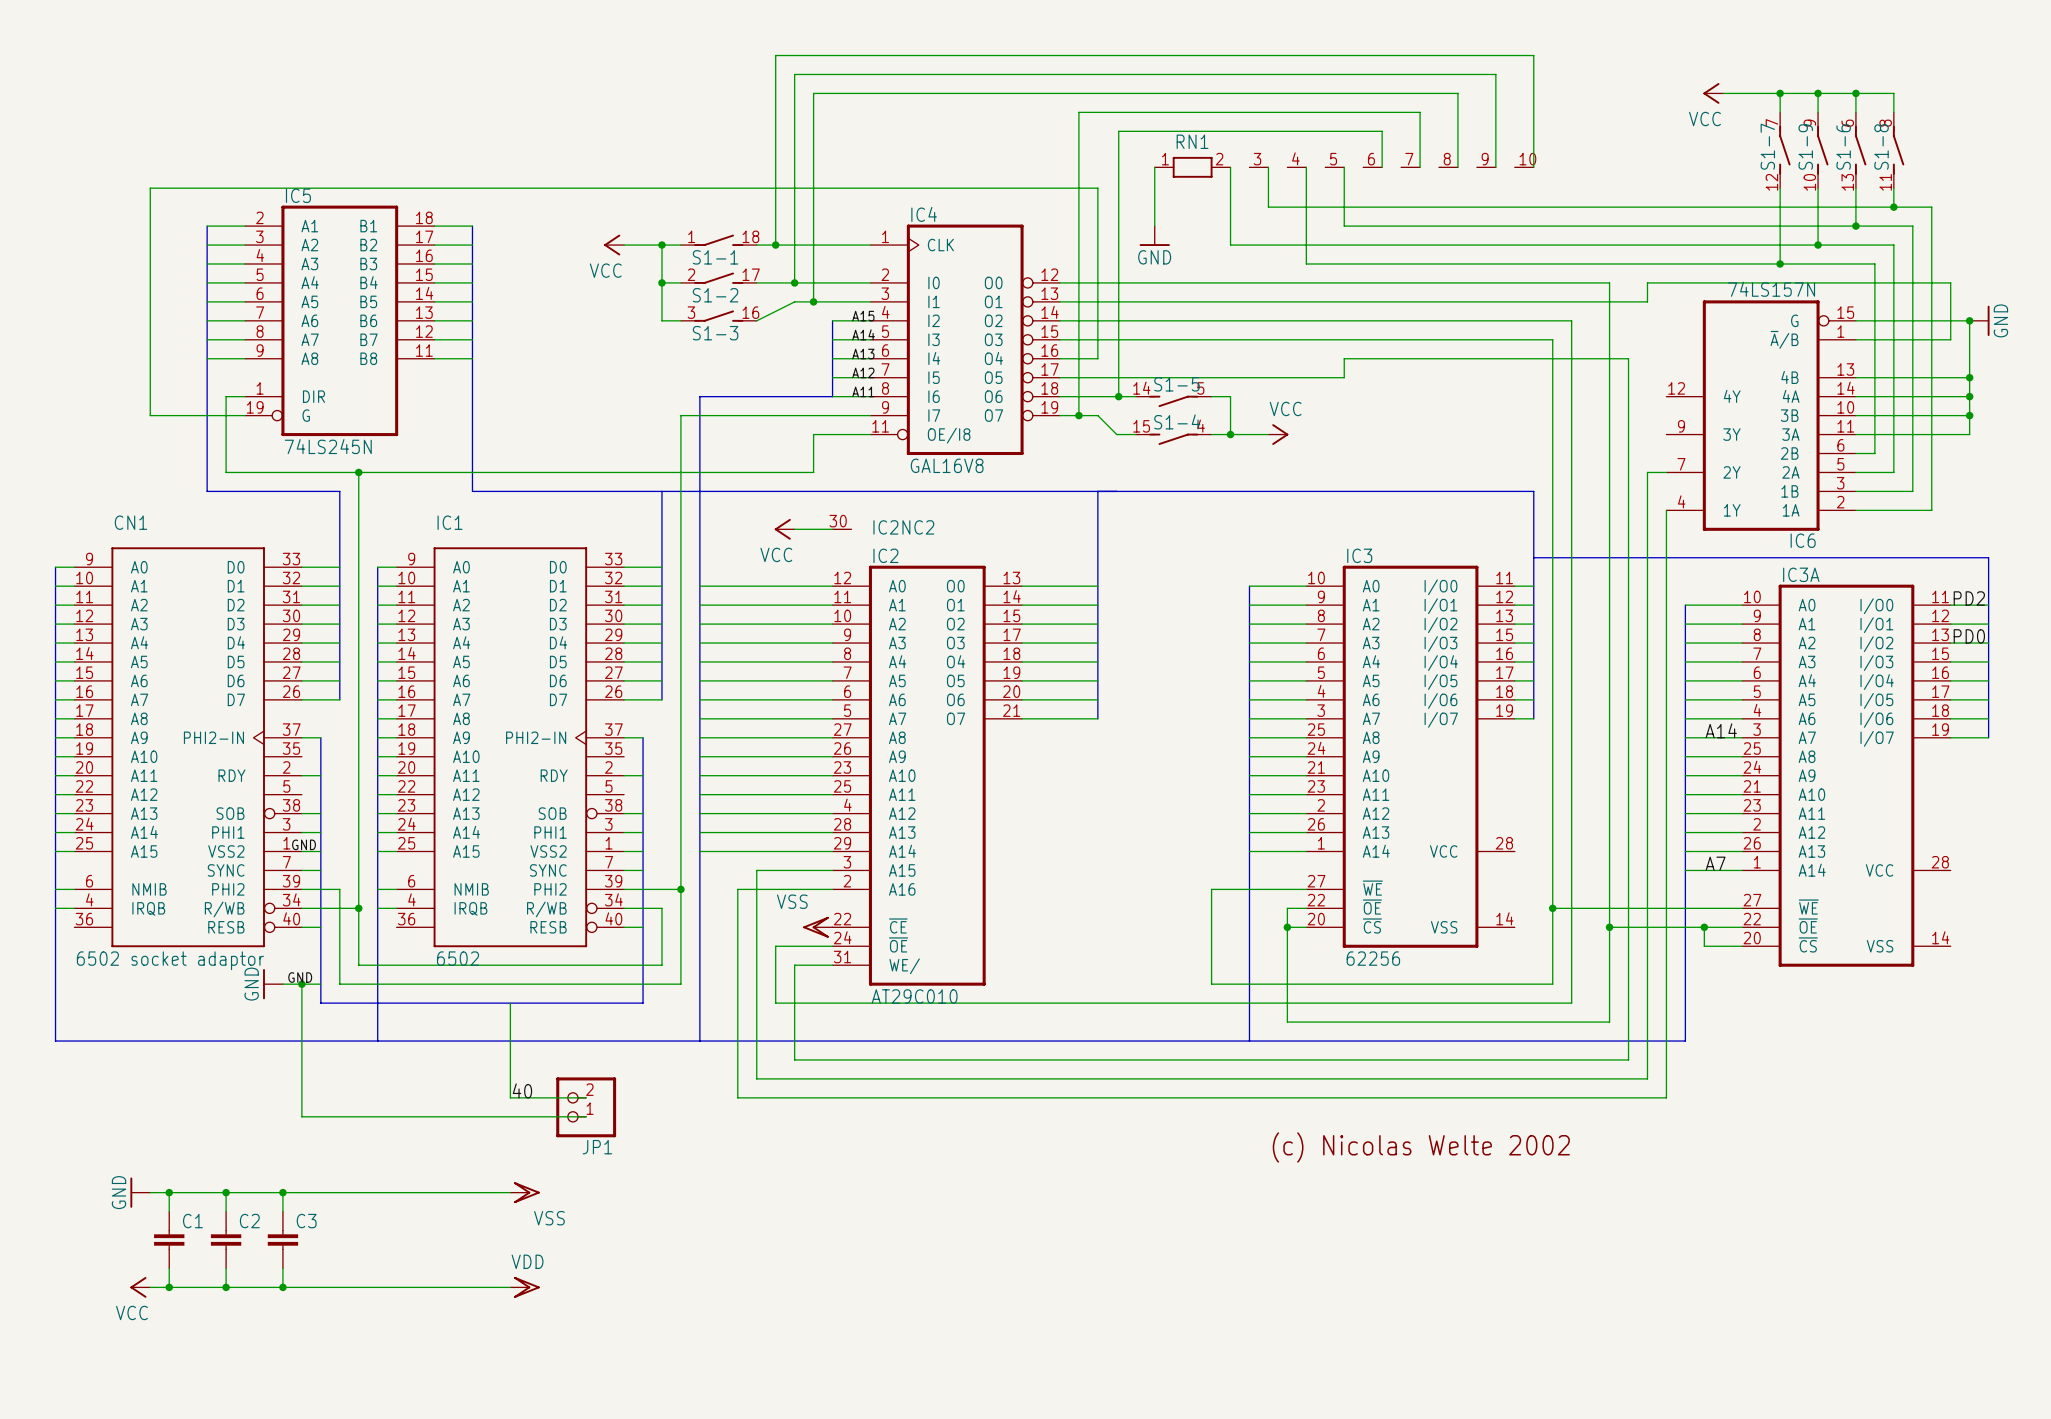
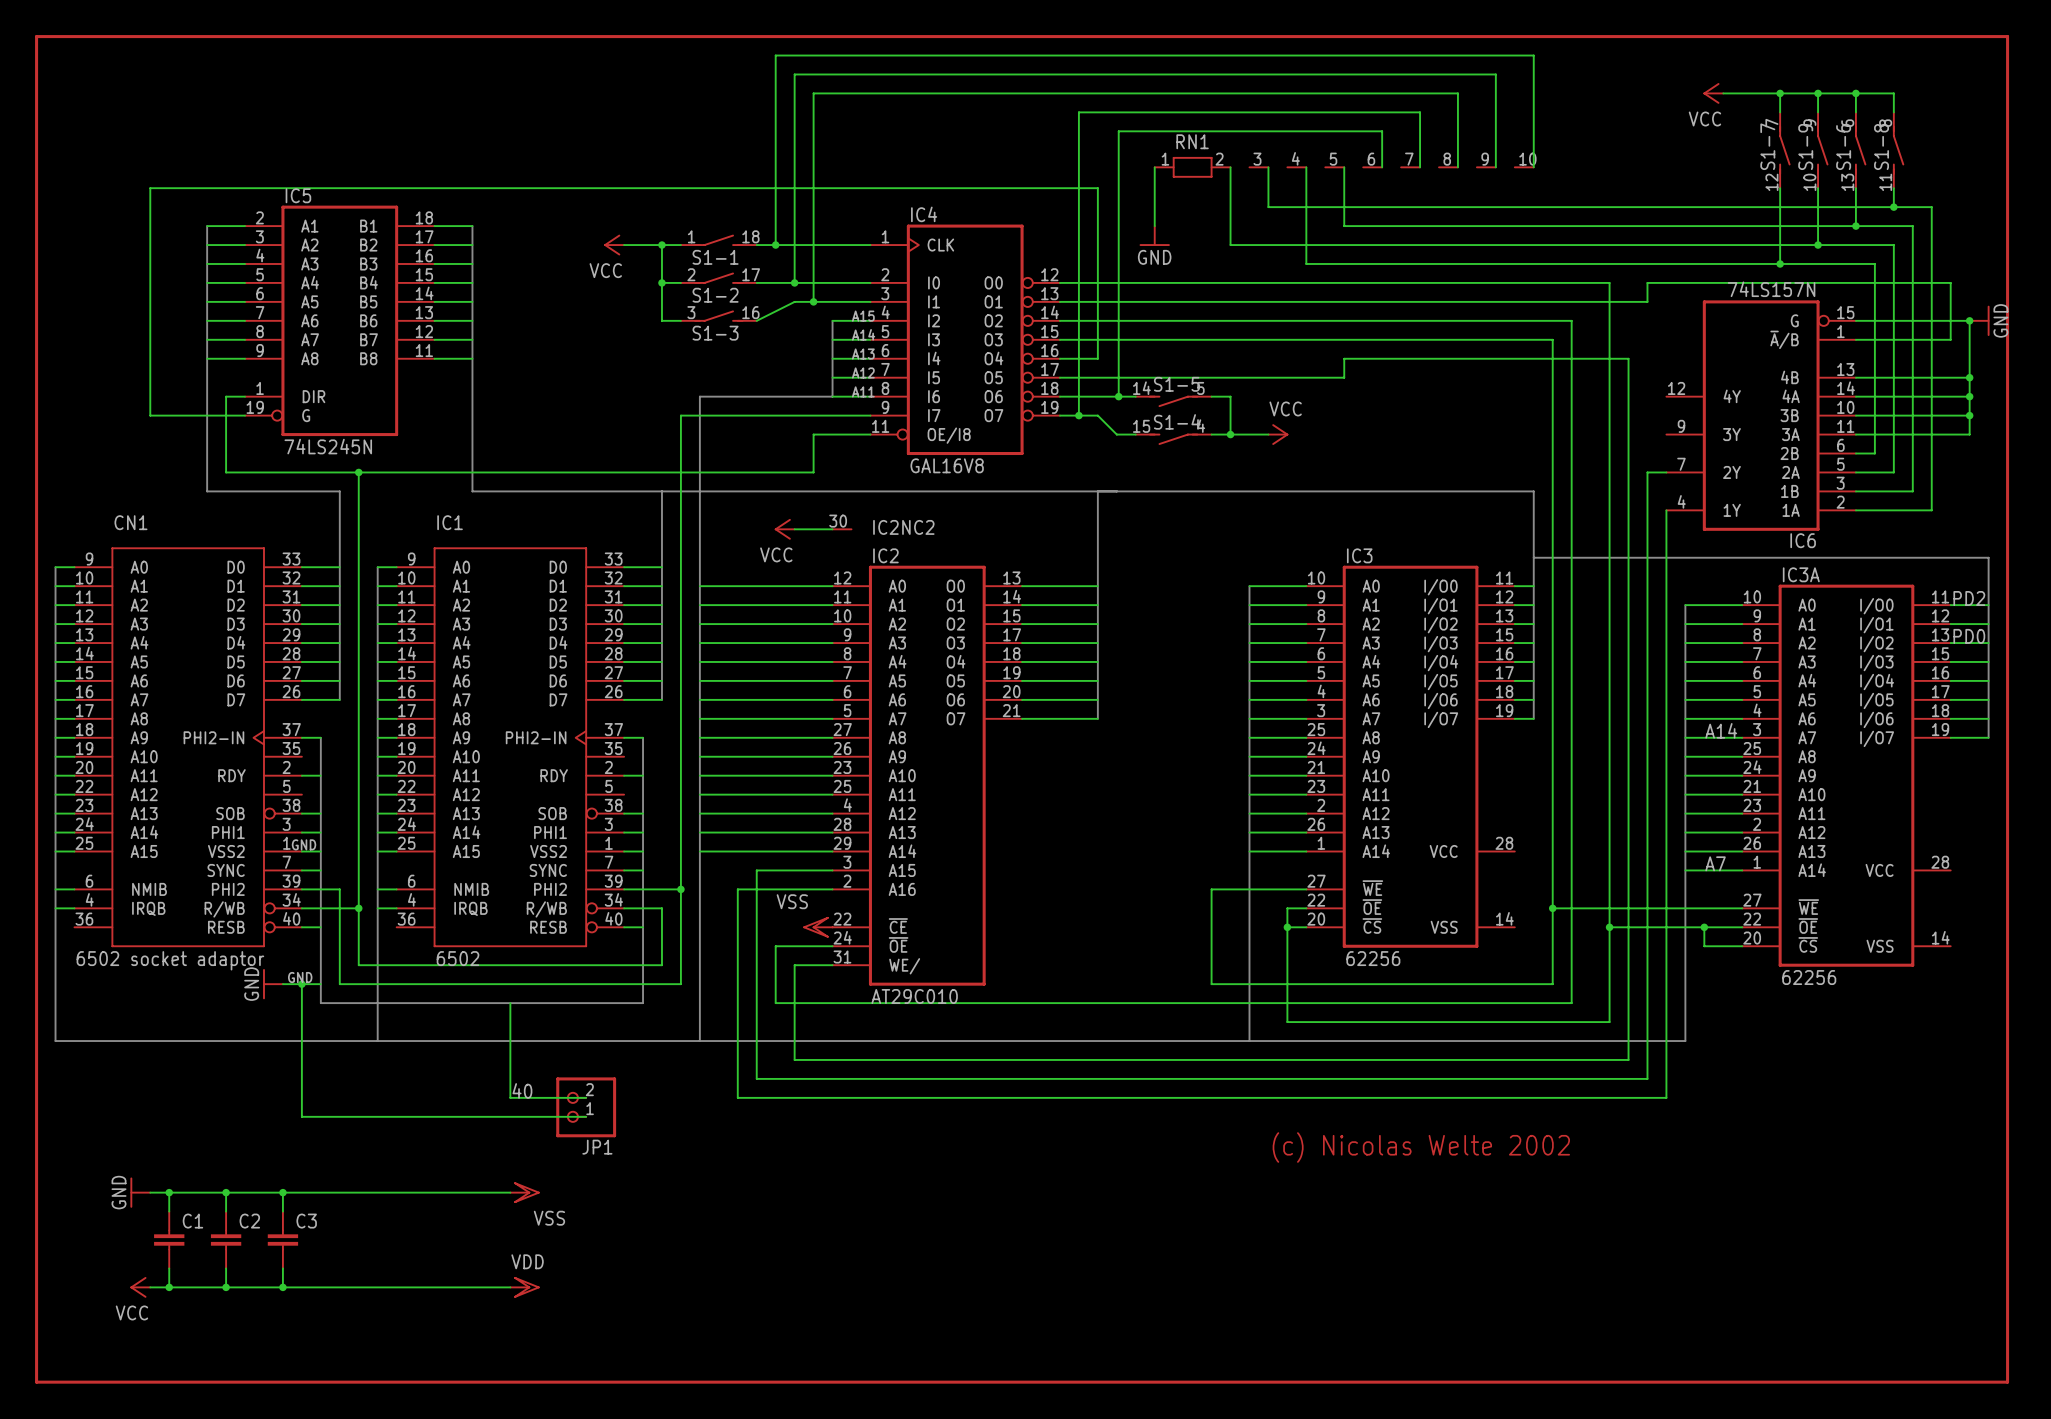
part: none -> (1022, 709)
IC3A value: none -> 62256 (1809, 977)

